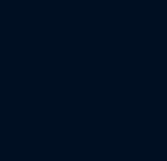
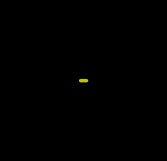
board edge: none -> (86, 80) (80, 80)

